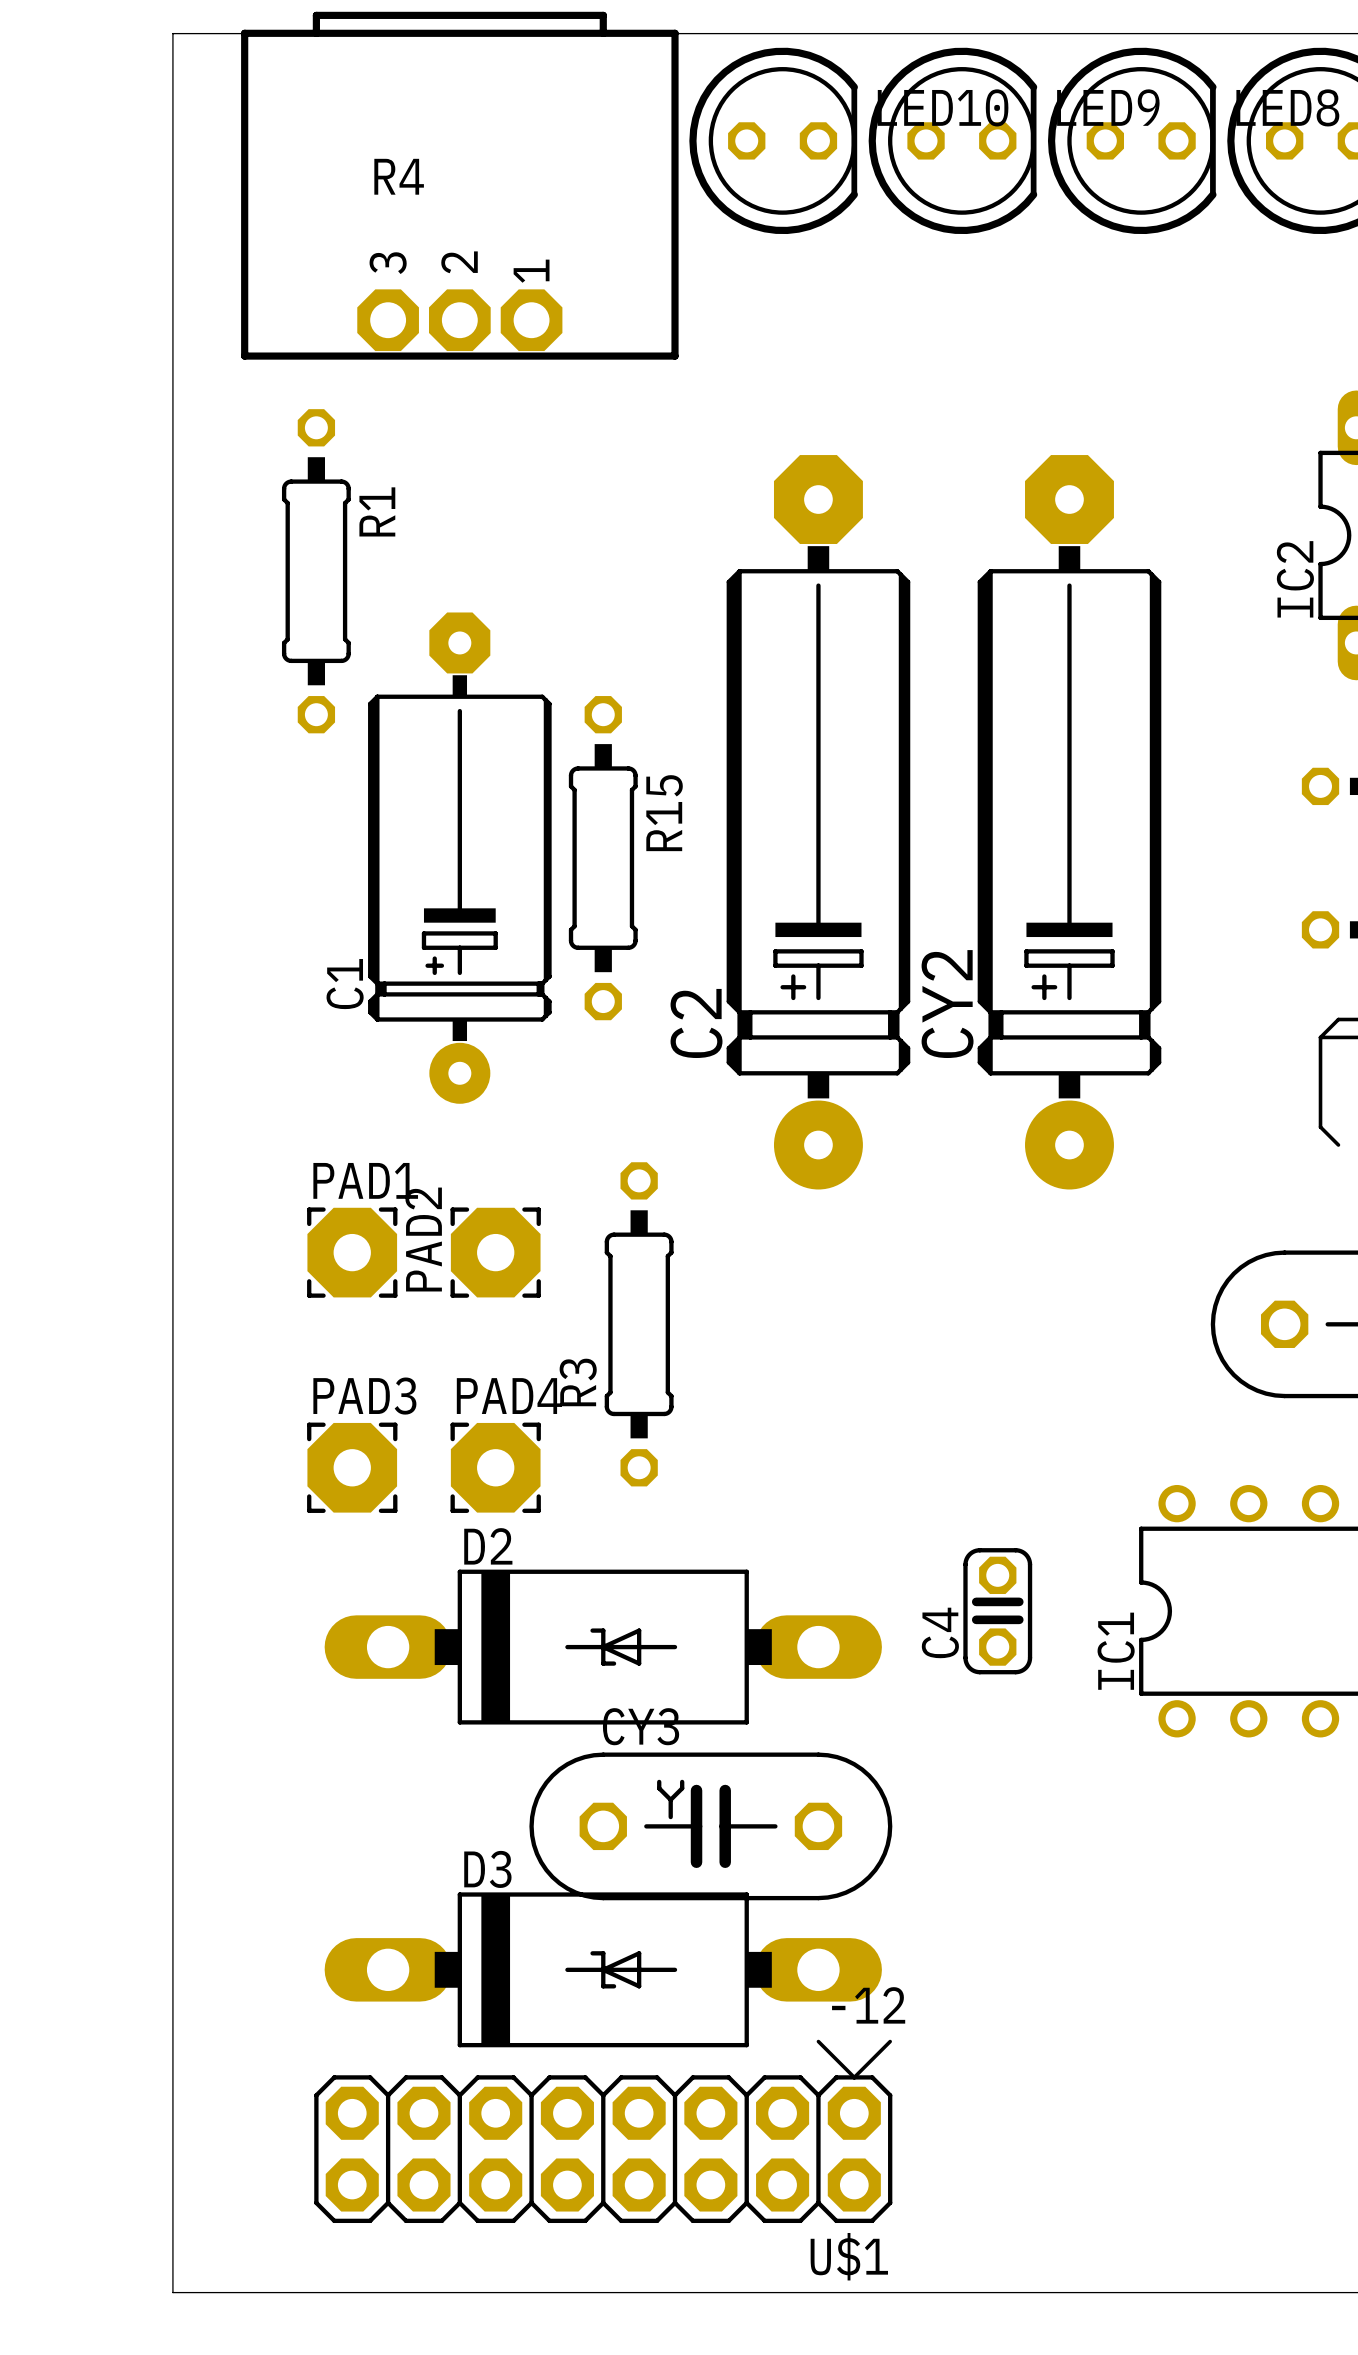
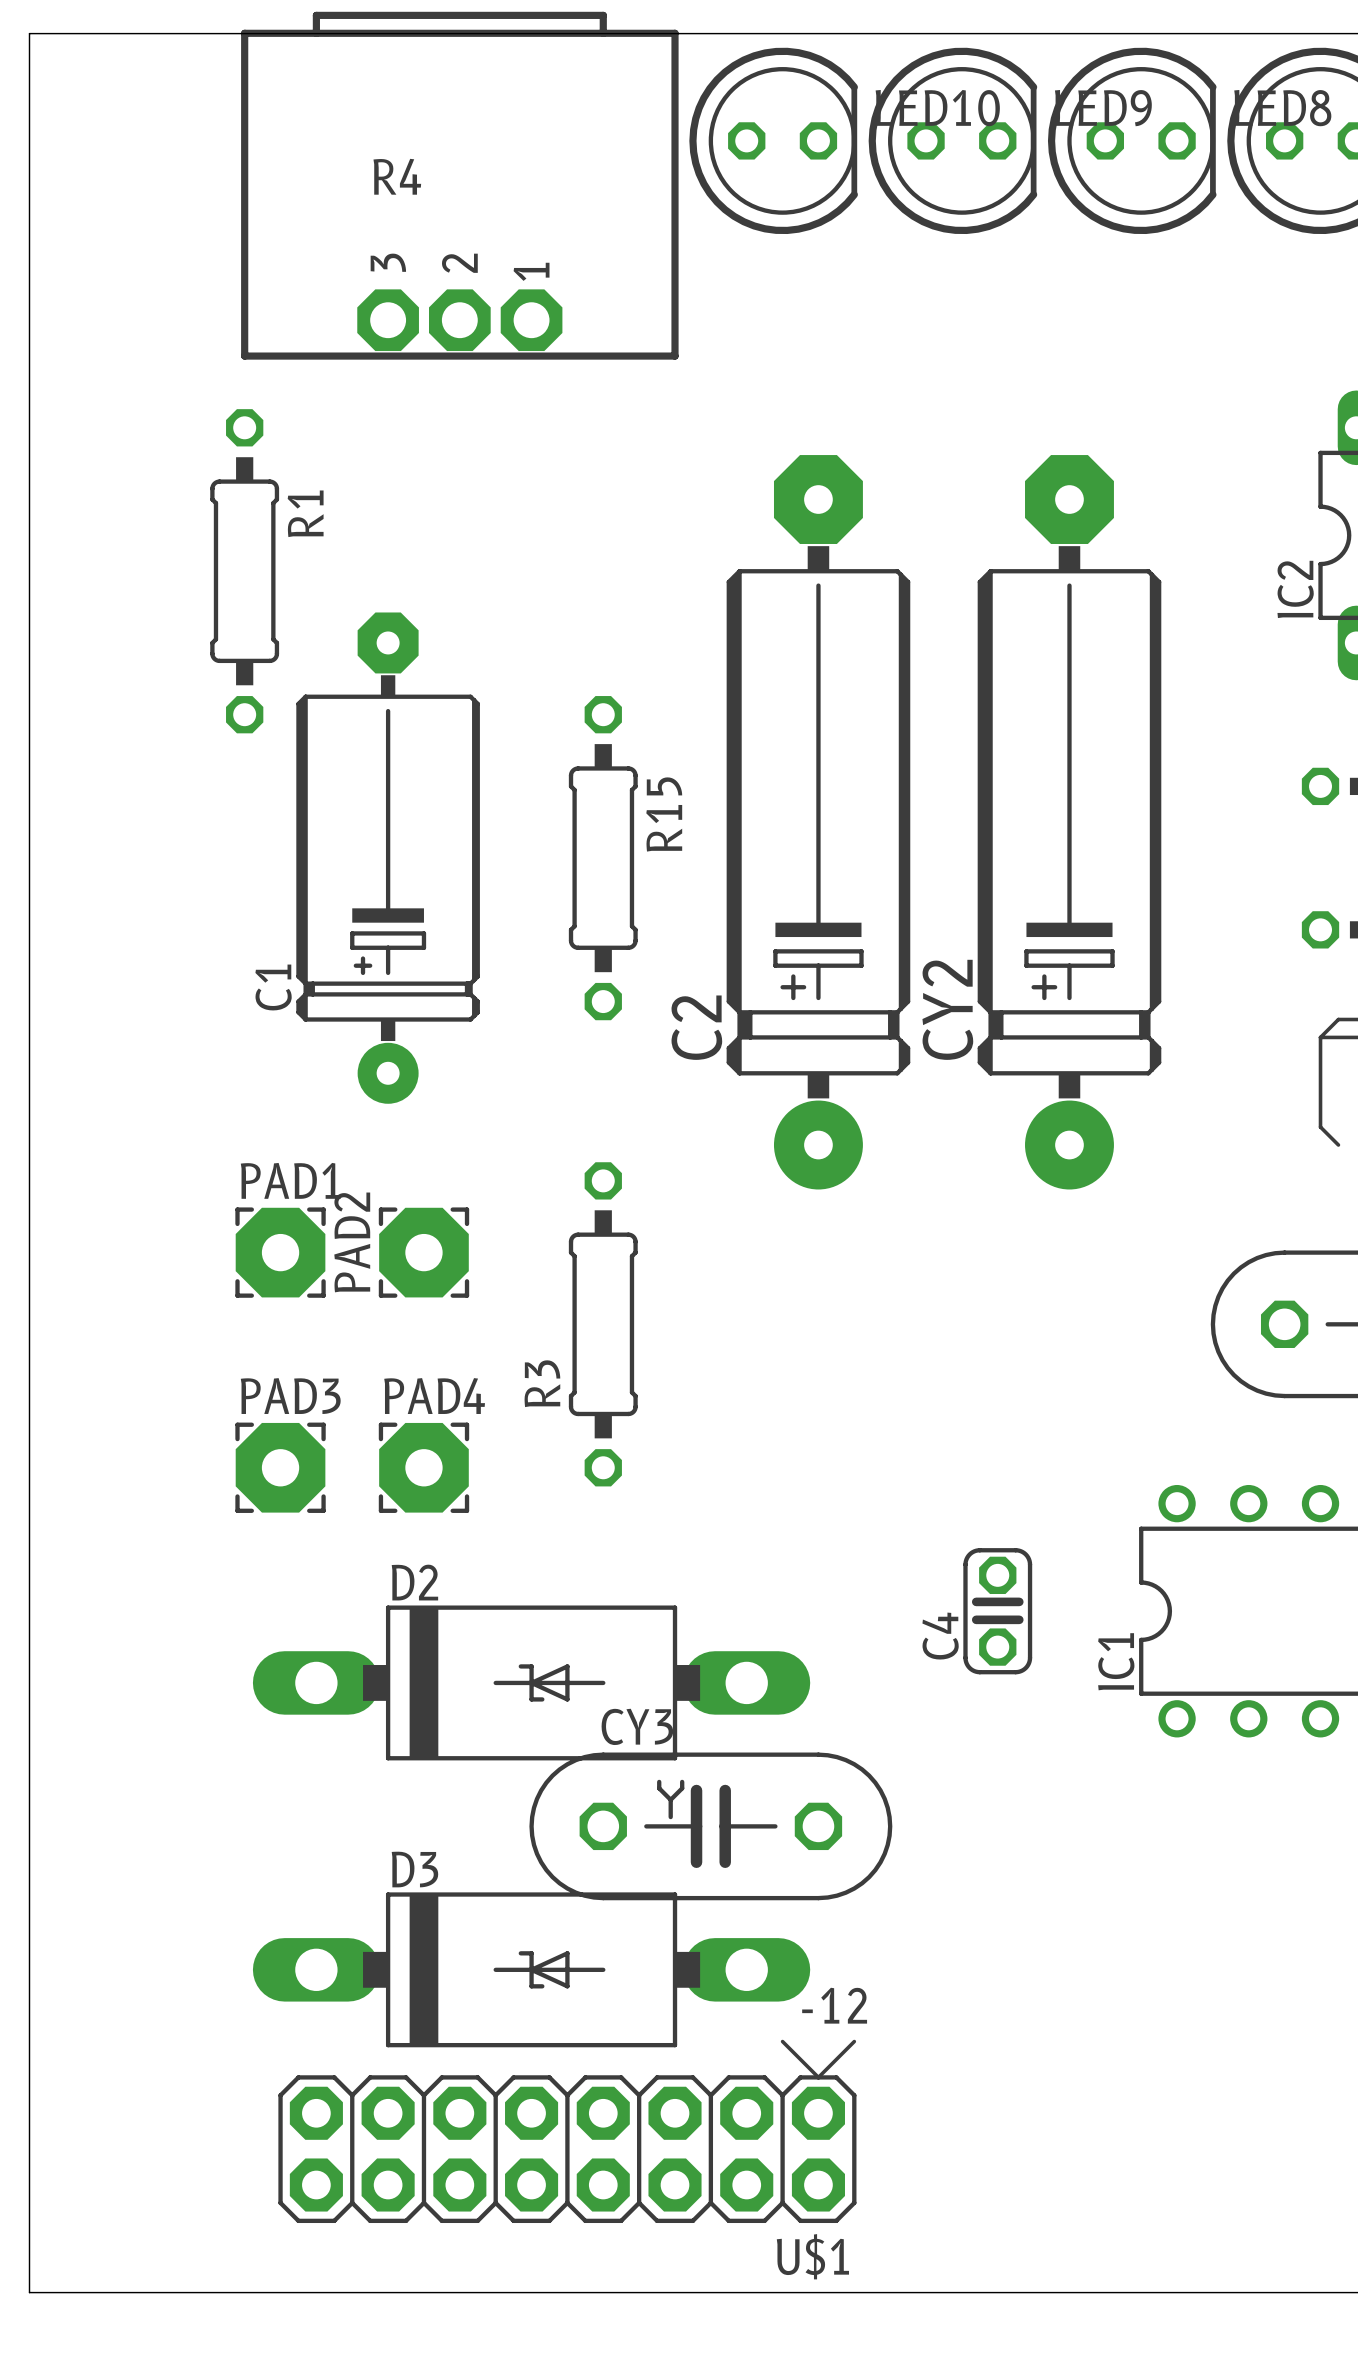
board edge: (172, 33) (172, 2292) -> (172, 33) (29, 33) (29, 2292) (172, 2292)
R1 position: (316, 571) -> (244, 571)
C1 position: (459, 858) -> (388, 858)
PAD1 position: (352, 1252) -> (280, 1252)
PAD2 position: (495, 1252) -> (423, 1252)
R3 position: (639, 1324) -> (603, 1324)
PAD3 position: (352, 1467) -> (280, 1467)
PAD4 position: (495, 1467) -> (423, 1467)
D2 position: (603, 1647) -> (531, 1682)
D3 position: (603, 1969) -> (531, 1969)
U$1 position: (603, 2131) -> (567, 2131)

